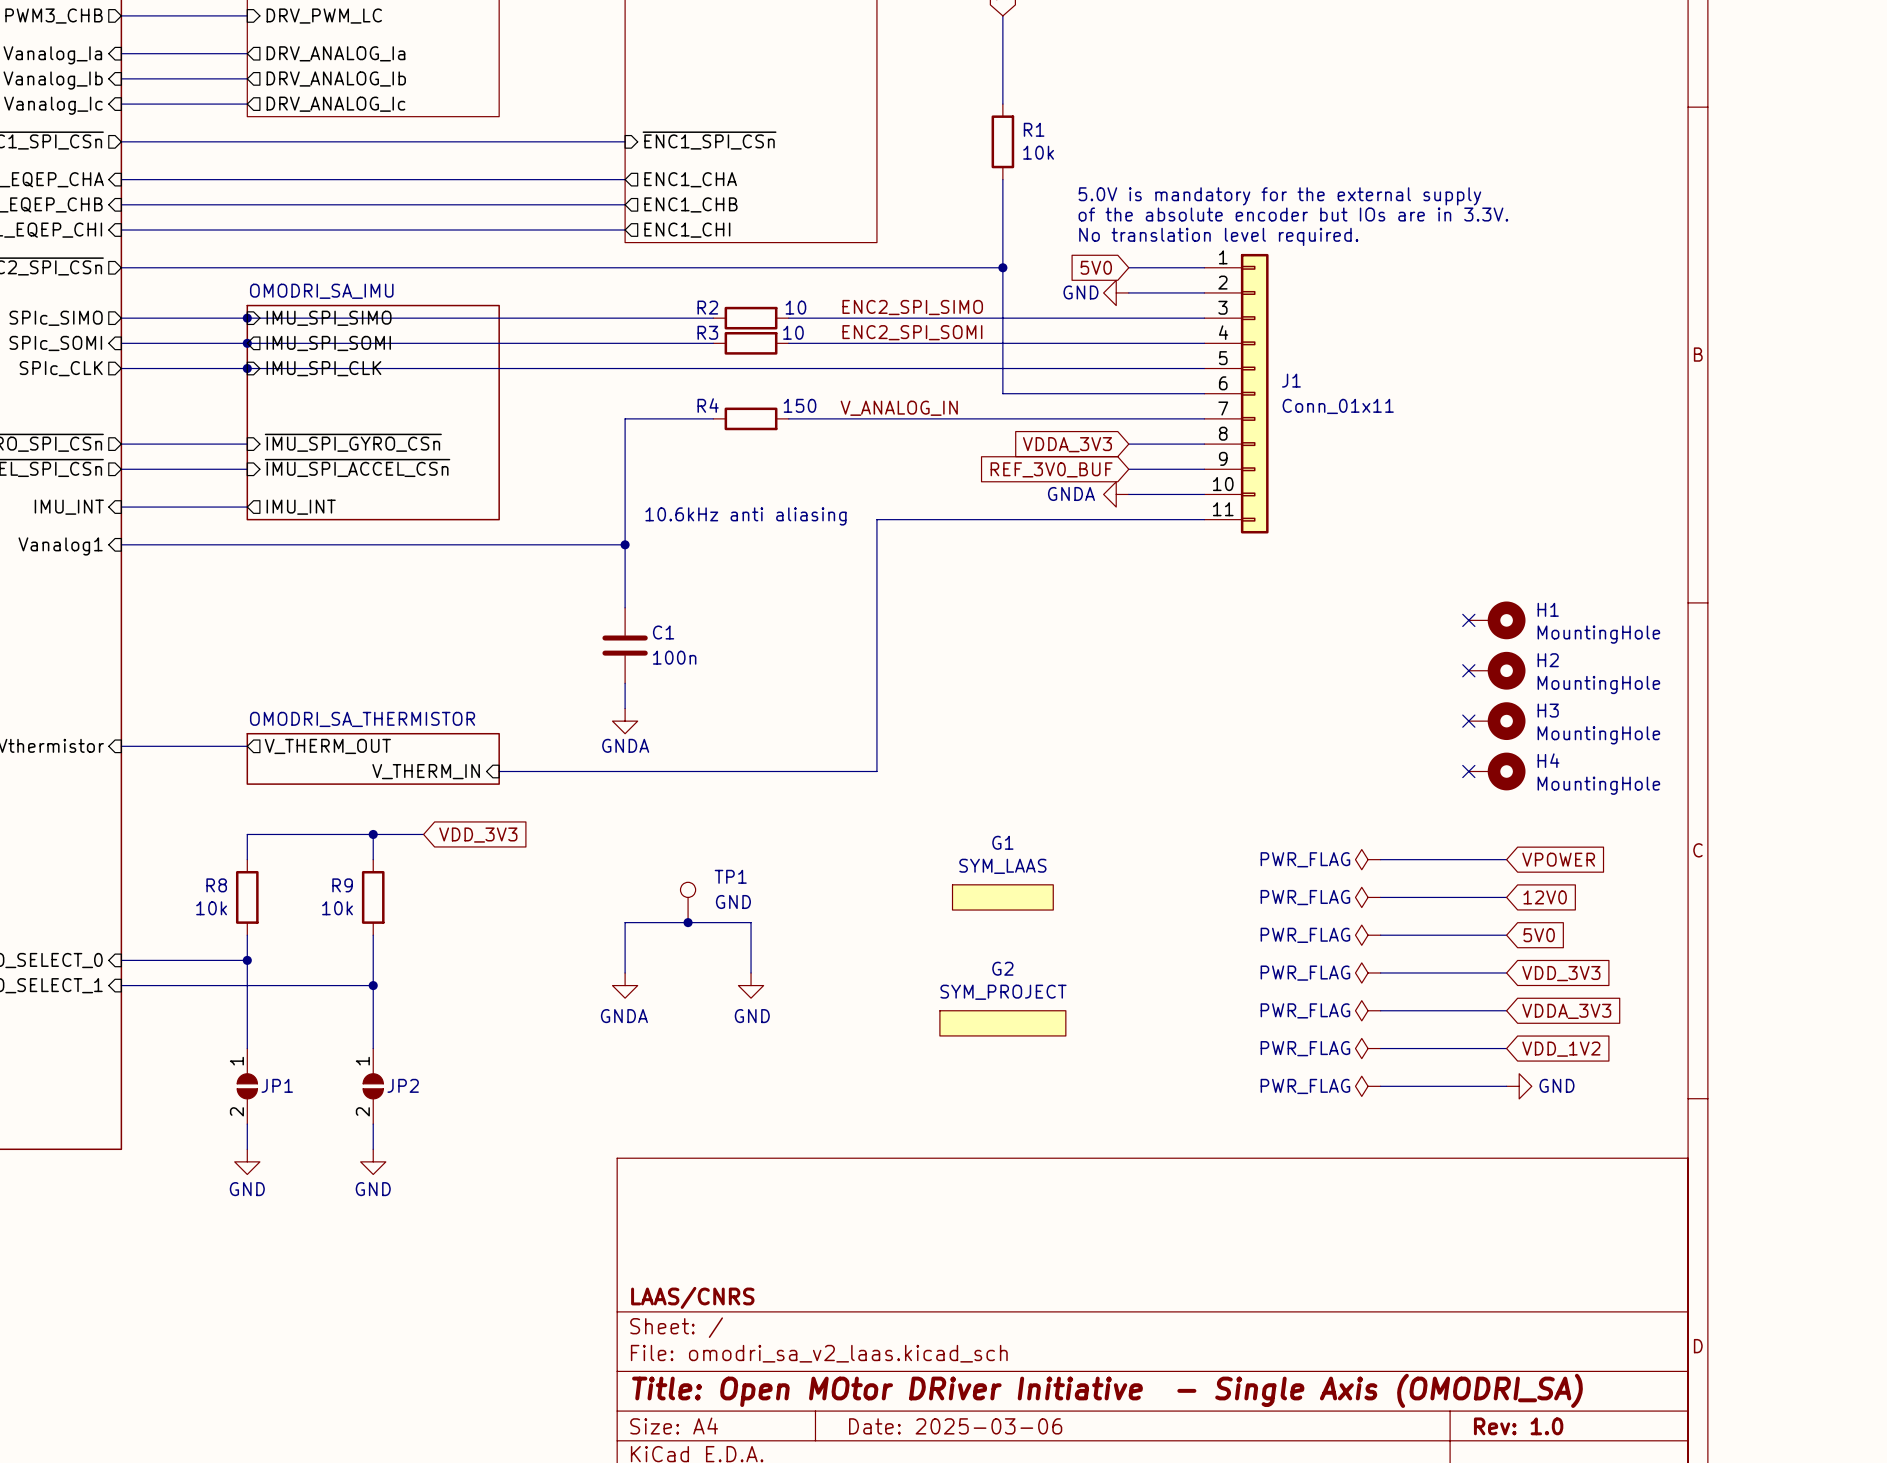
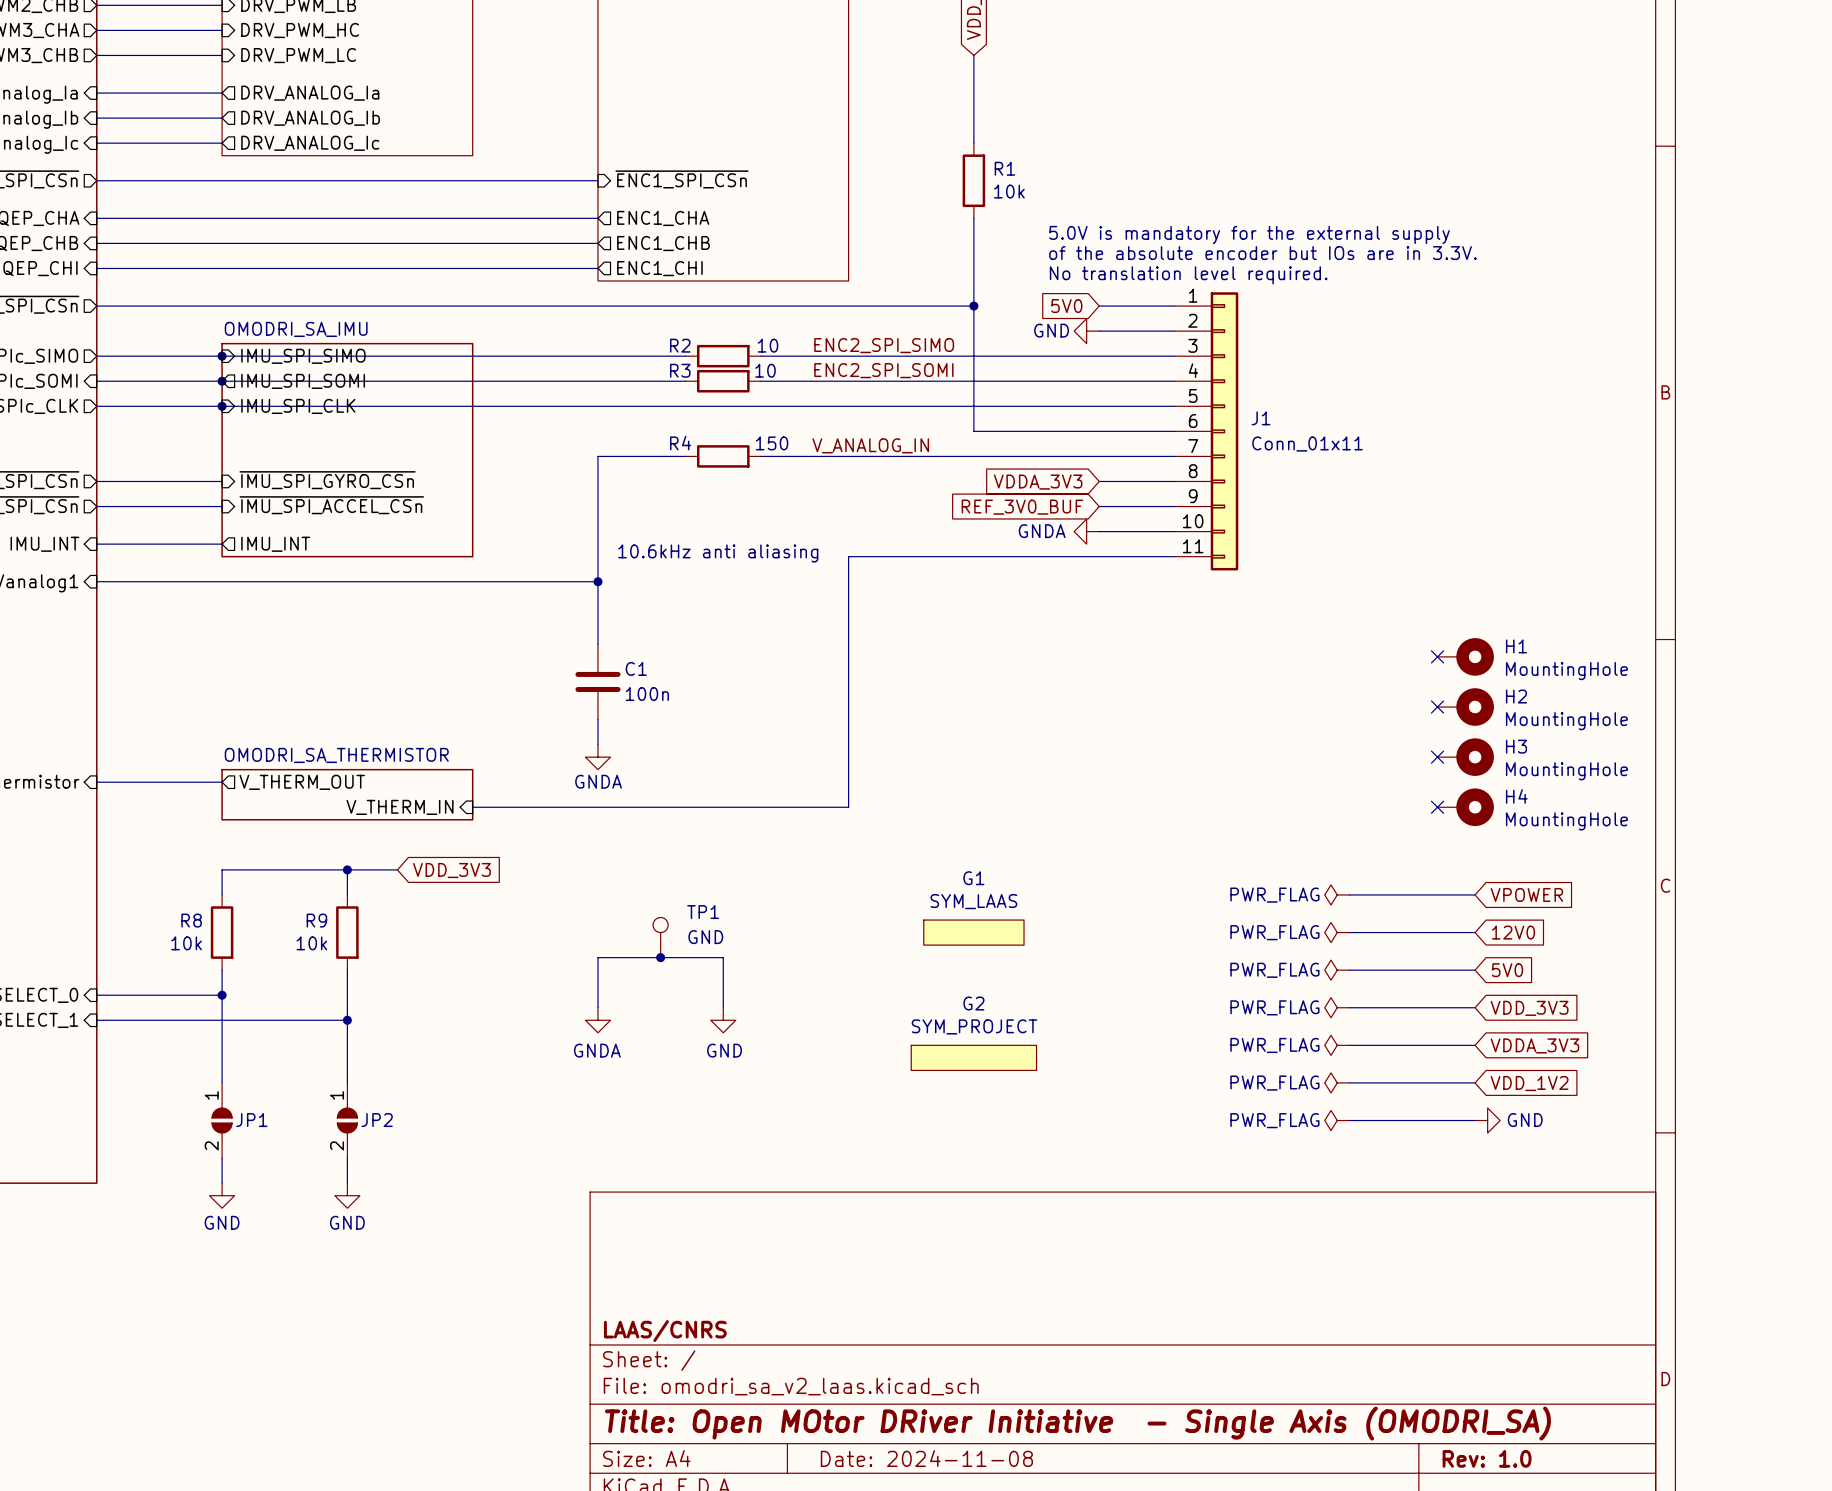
title block: Date: 2025-03-06 (955, 1426) -> Date: 2024-11-08 (926, 1458)

